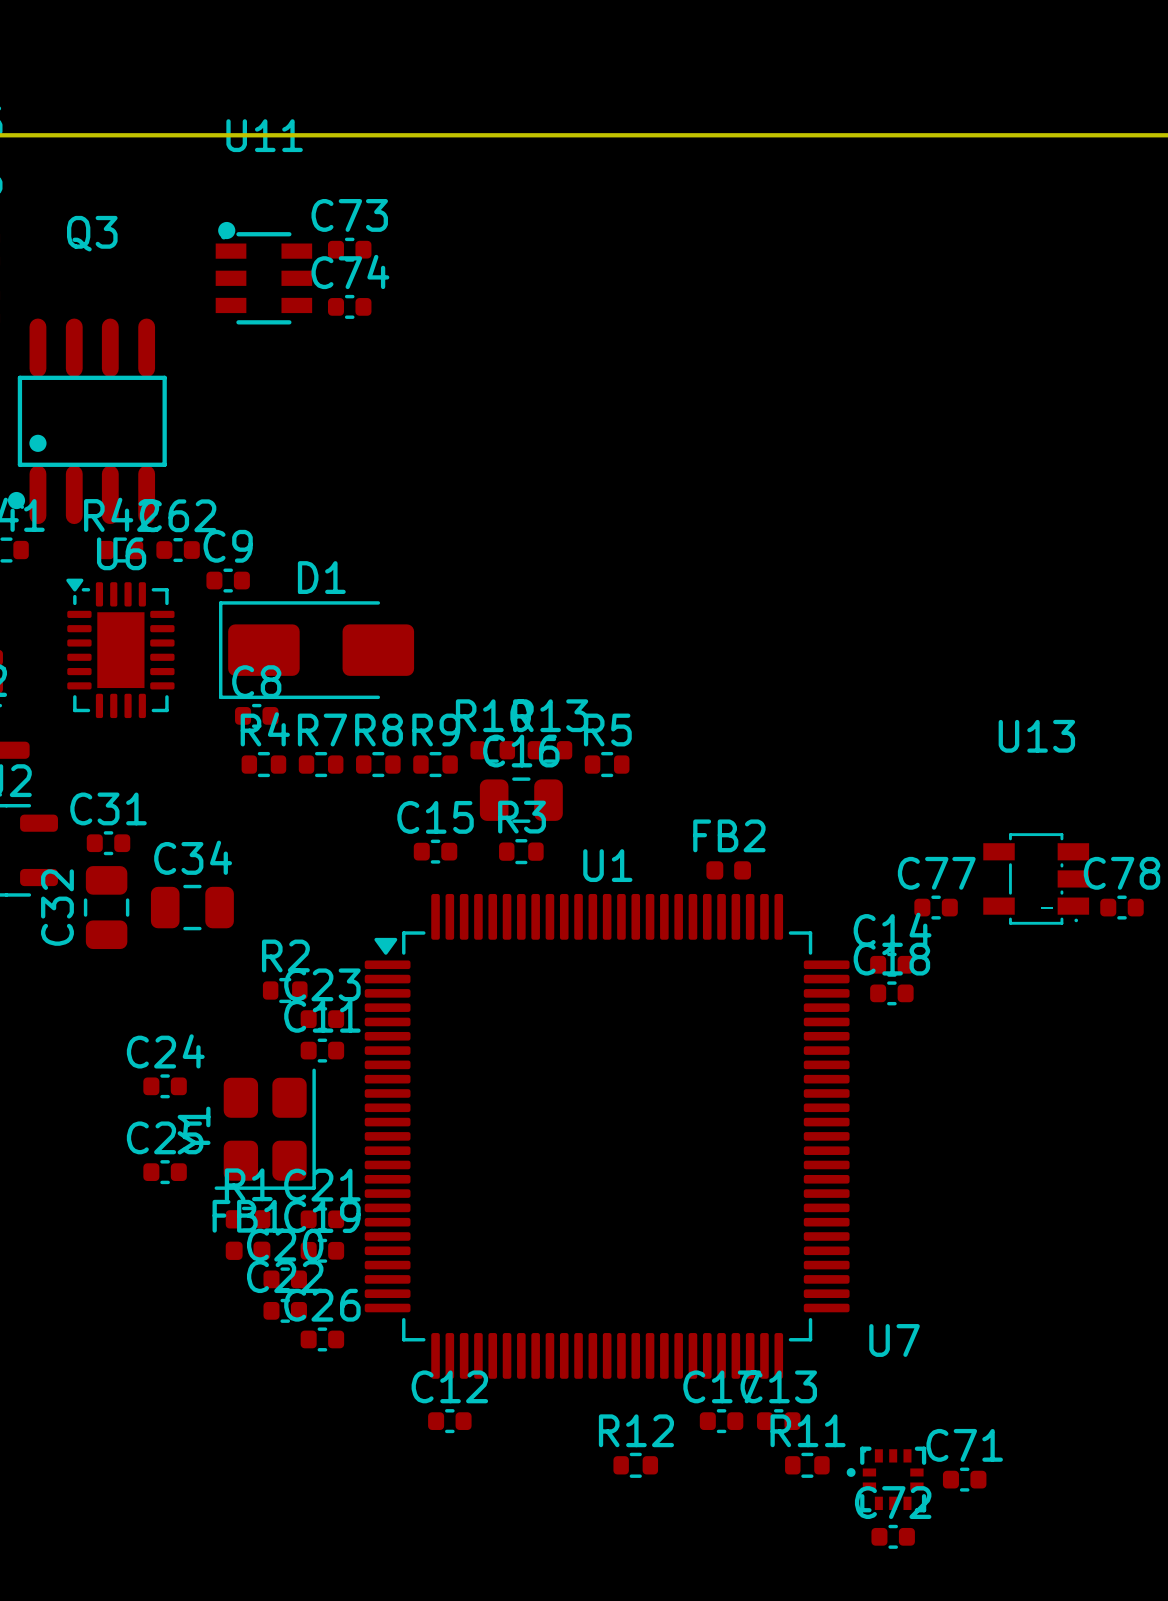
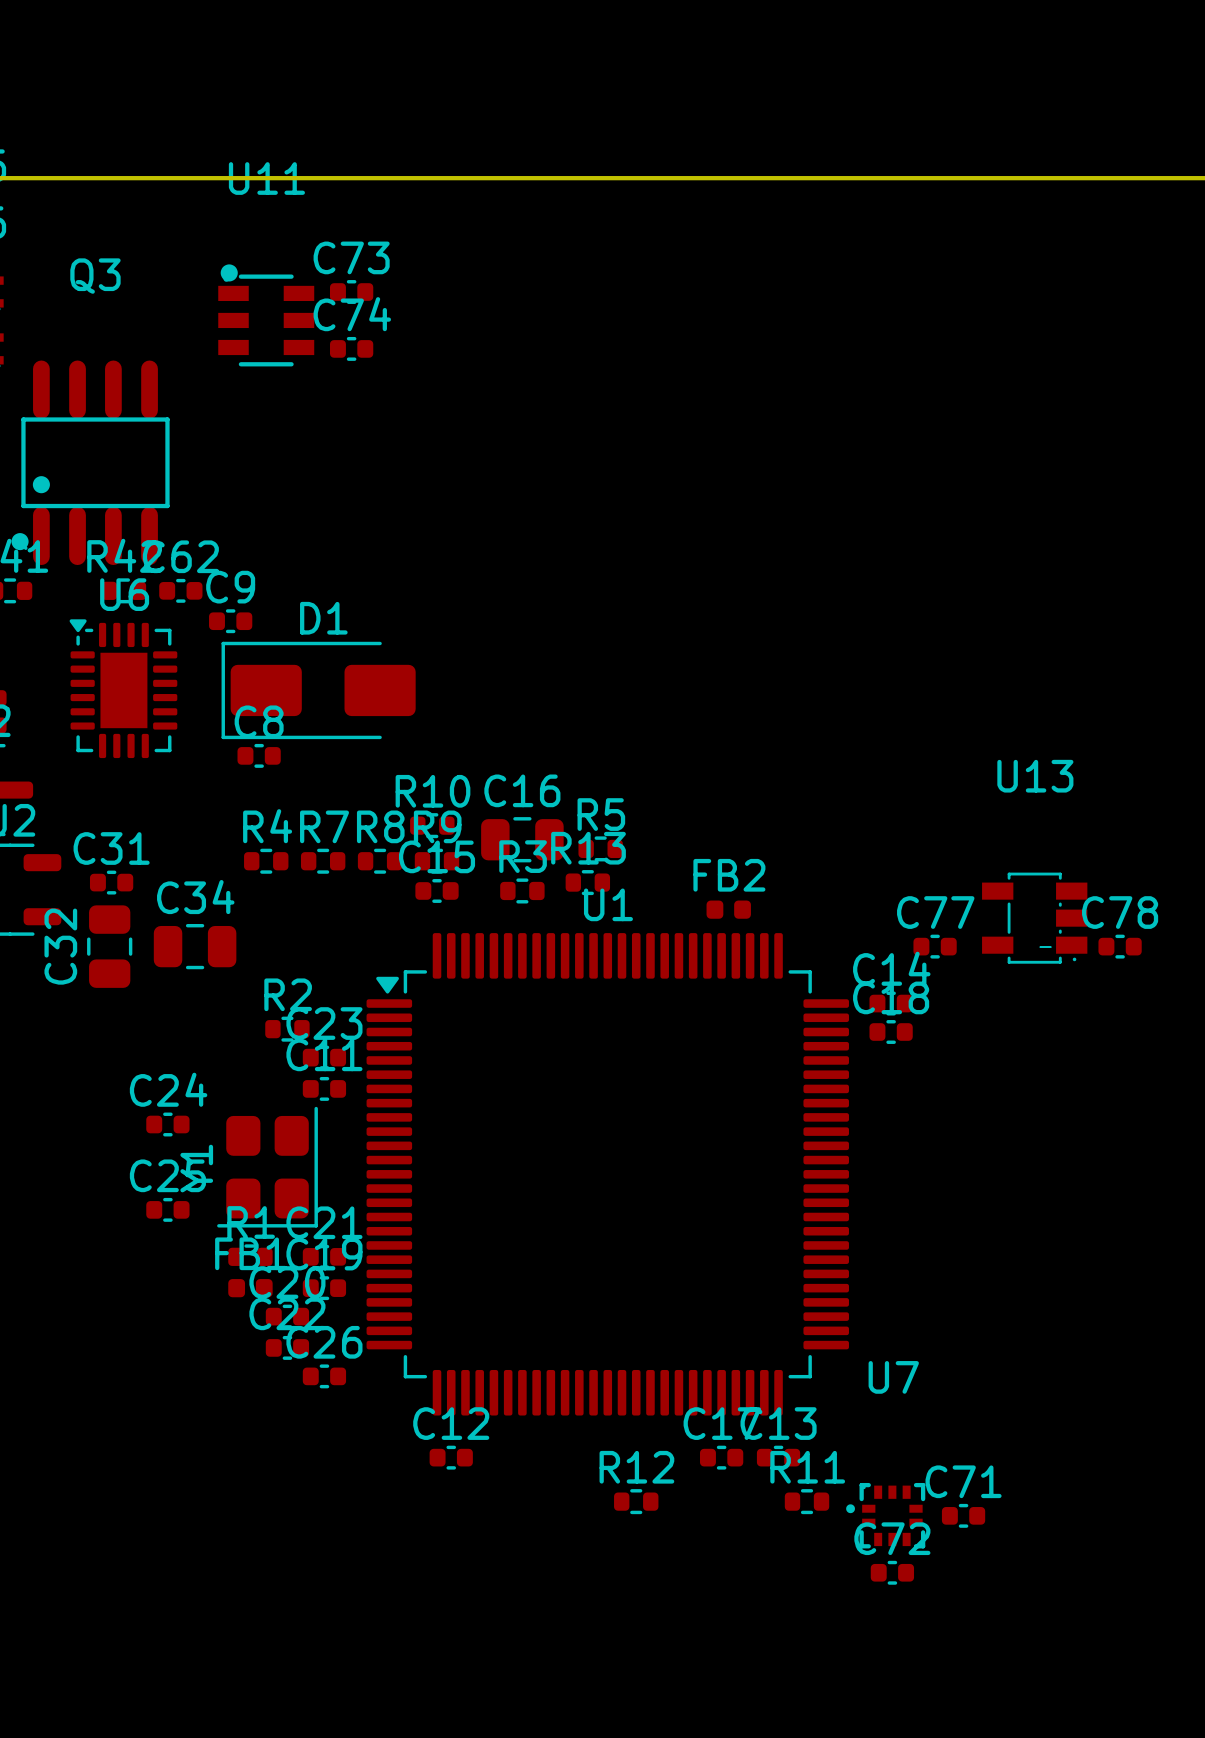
R10 position: (492, 750) -> (432, 825)
R13 position: (549, 750) -> (587, 882)
R4 position: (263, 764) -> (266, 861)
R7 position: (321, 764) -> (323, 861)
R8 position: (378, 764) -> (380, 861)
R9 position: (435, 764) -> (437, 861)
R5 position: (607, 764) -> (600, 848)

